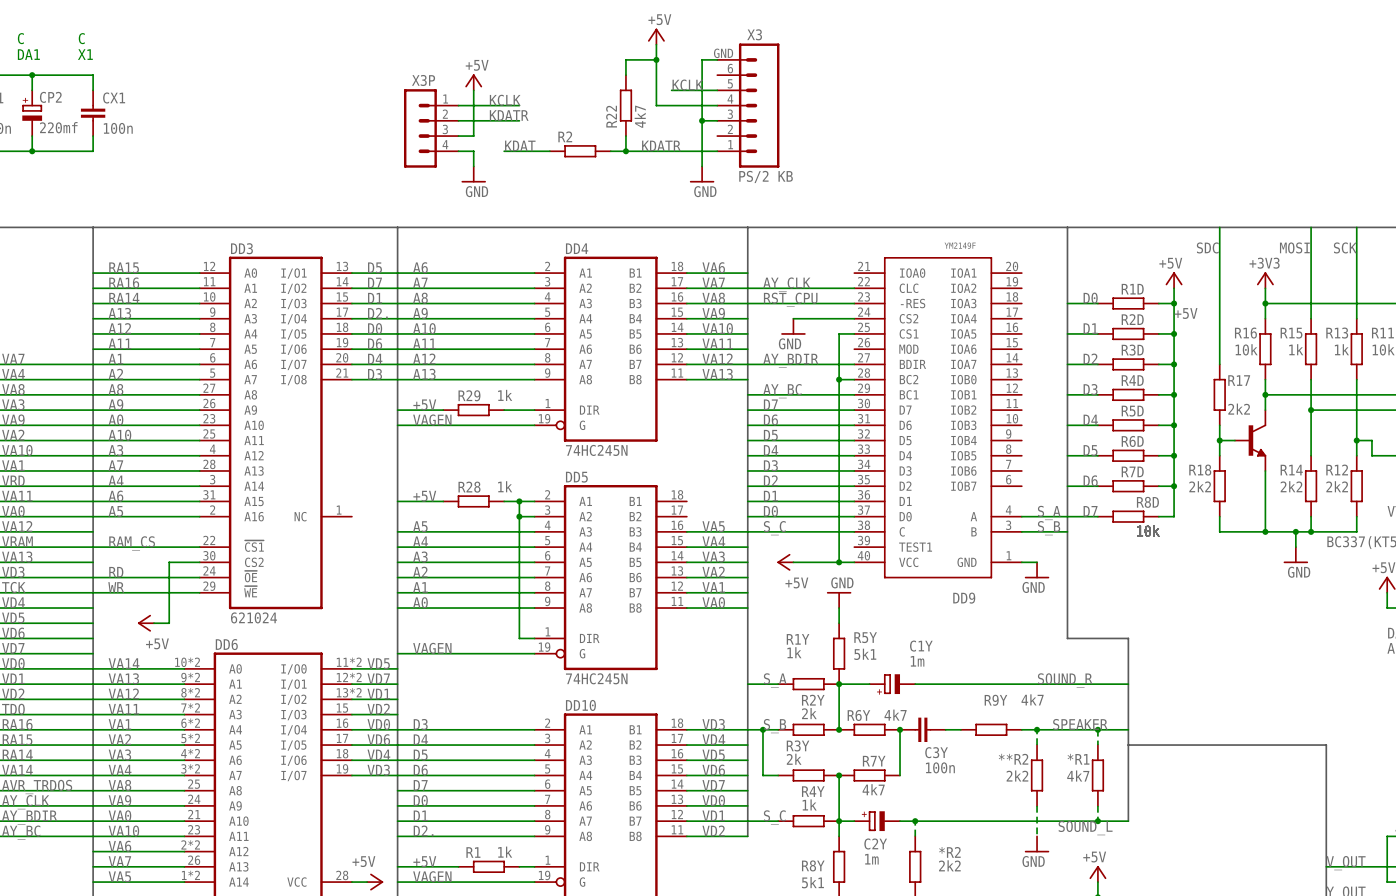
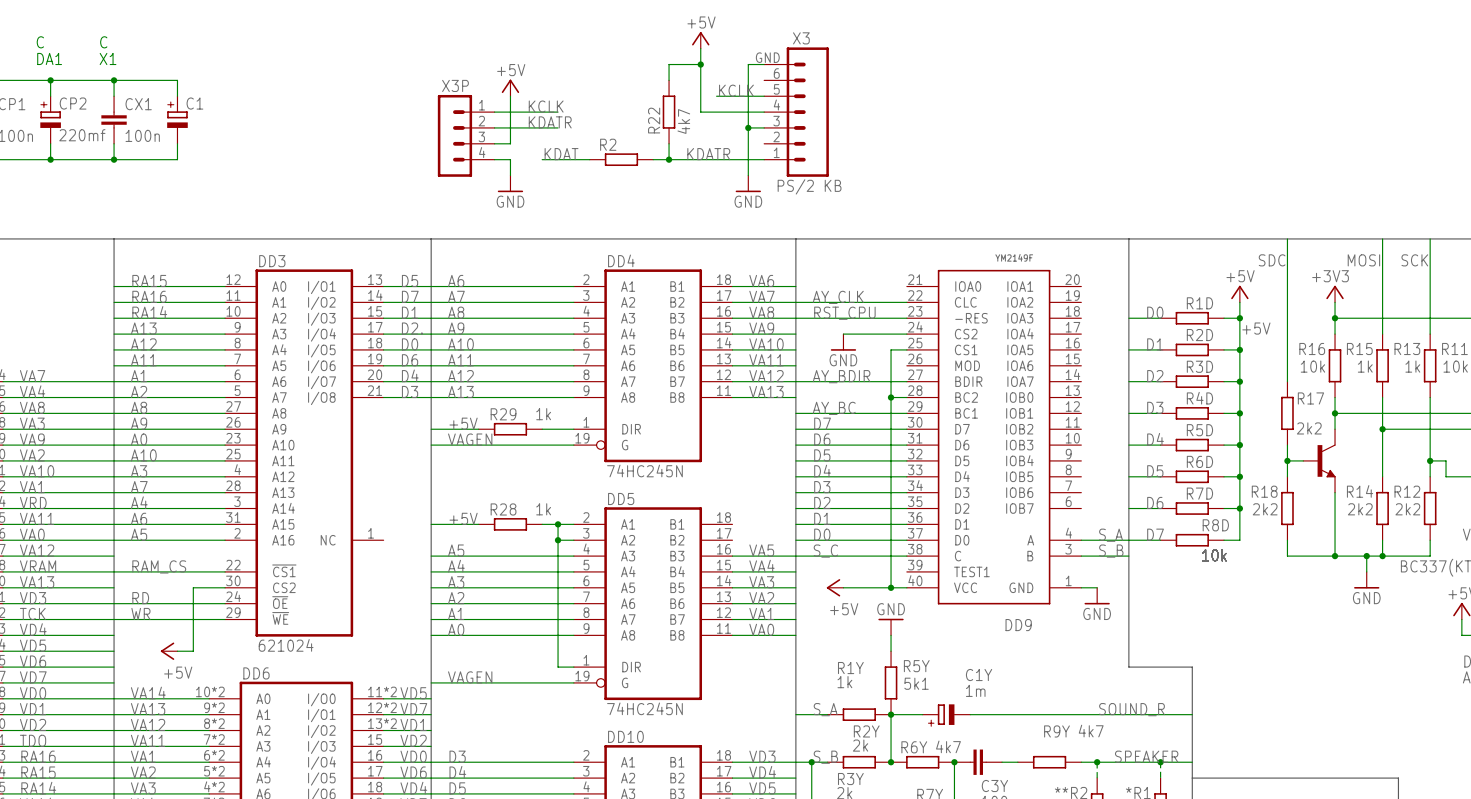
wire: none -> (114, 80) (177, 80) (177, 96)
junction: none -> (114, 80)
C1: none -> (177, 120)
wire: none -> (177, 143) (177, 159) (114, 159)
junction: none -> (114, 159)

